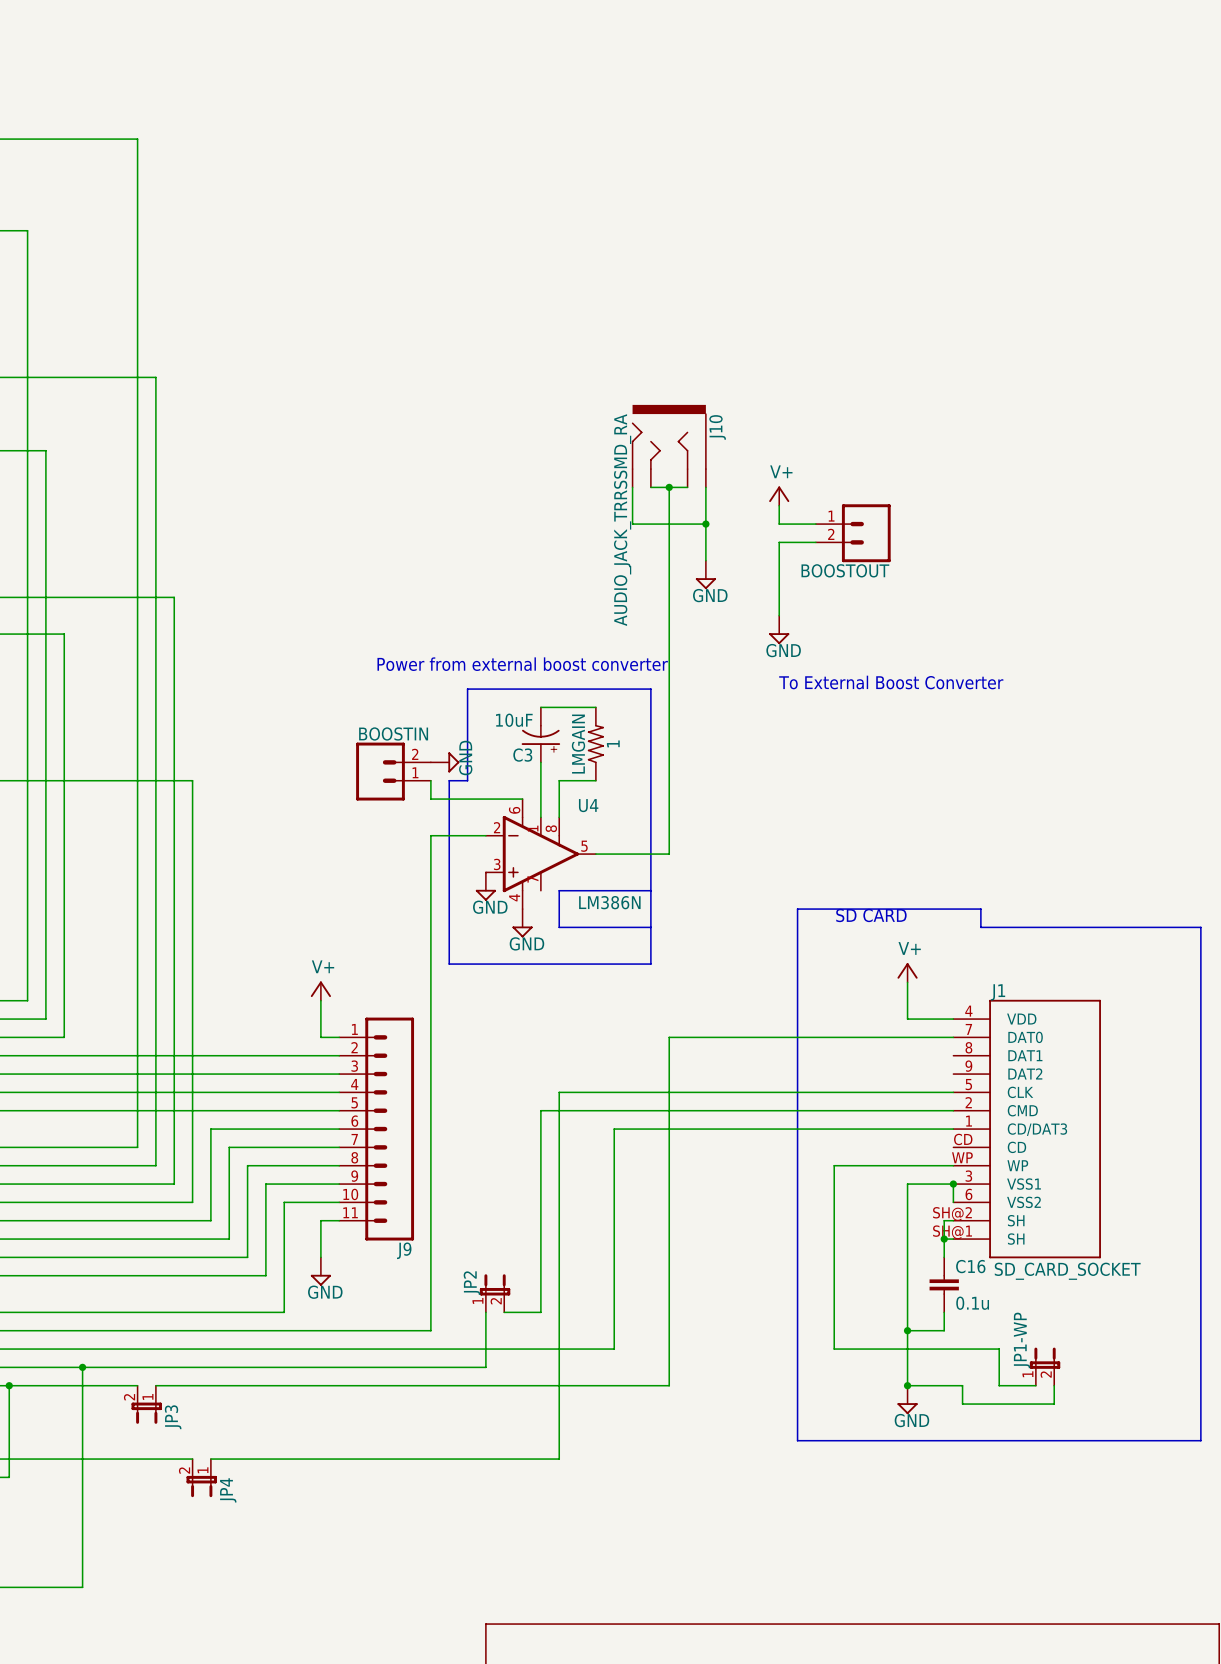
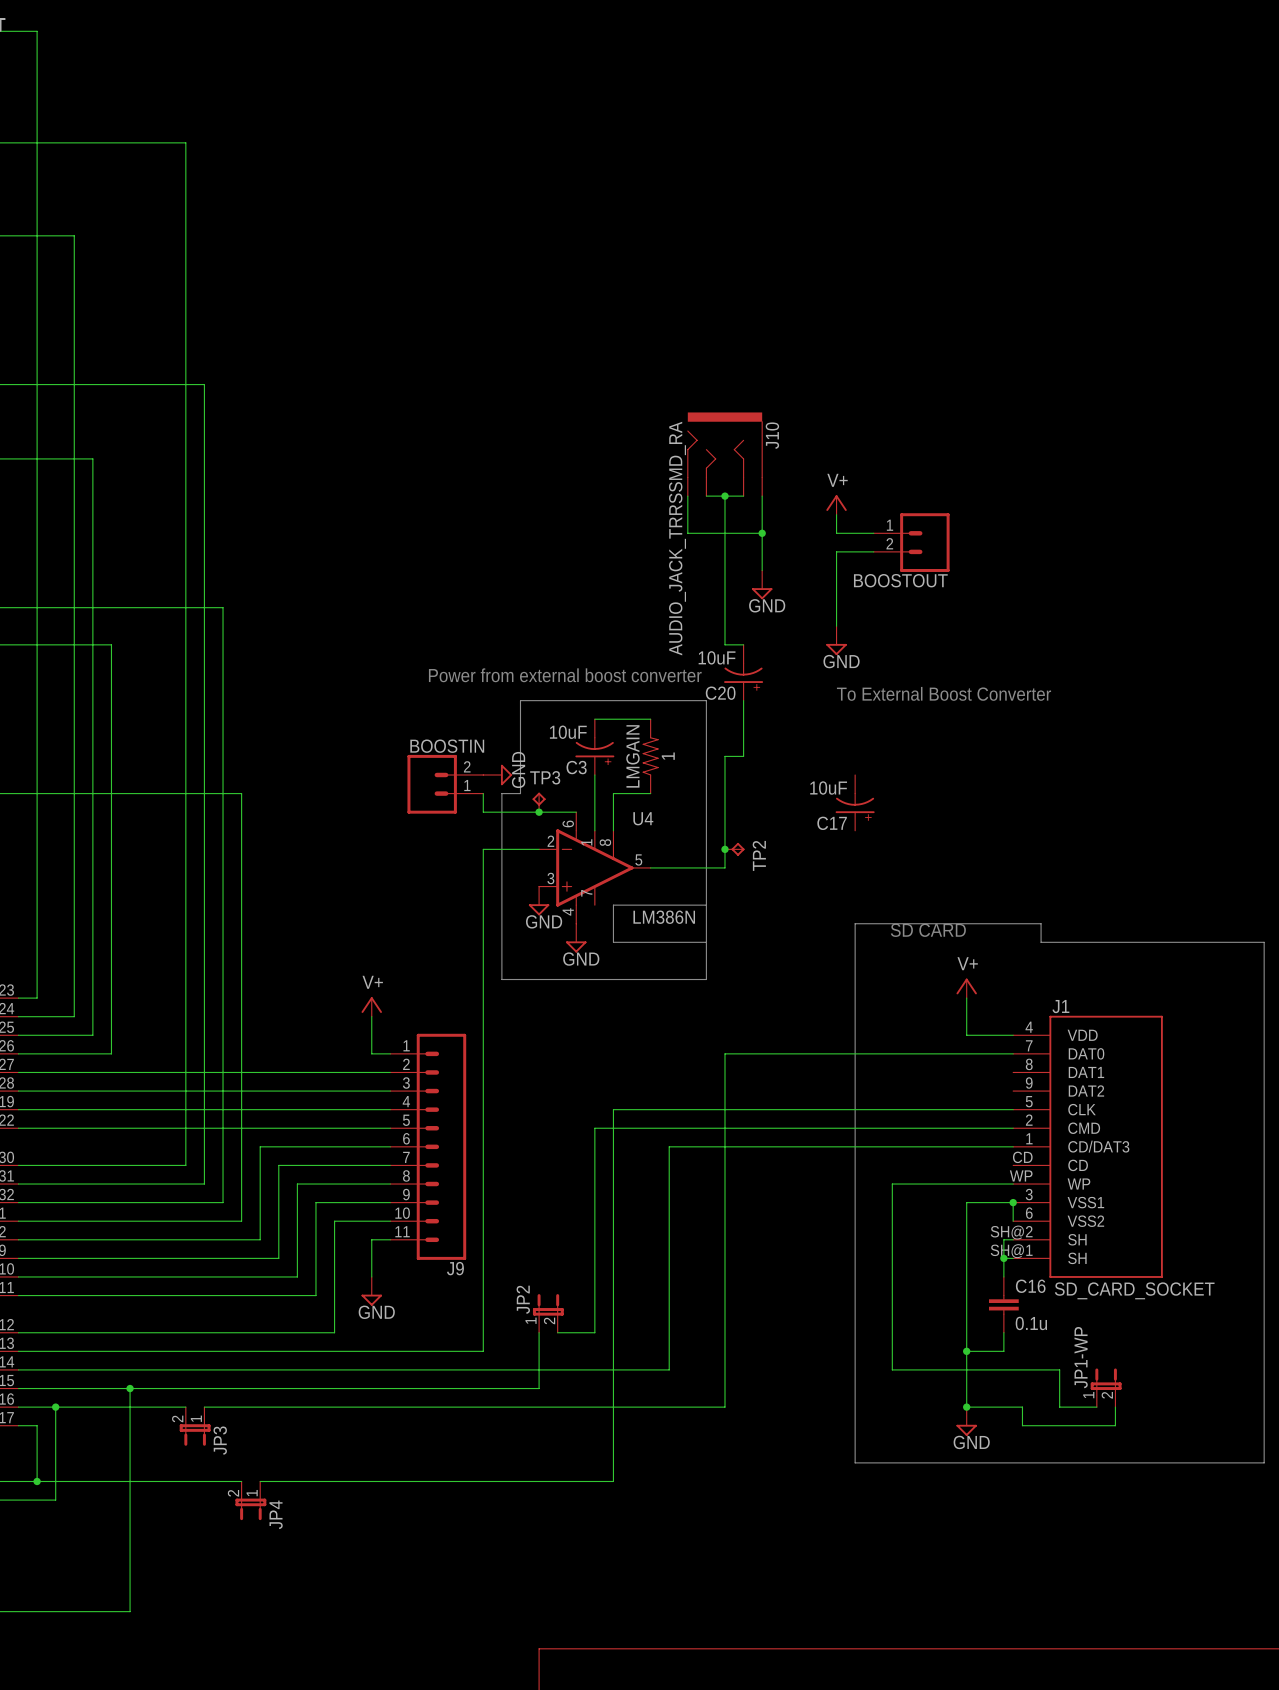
wire: (669, 634) (669, 744) -> (743, 700) (743, 756) (725, 756)
wire: none -> (725, 644) (743, 644)
C20: none -> 10uF (743, 672)
TP3: none -> (539, 802)
C17: none -> 10uF (855, 802)
junction: none -> (539, 812)
junction: none -> (725, 849)
TP2: none -> (734, 849)

